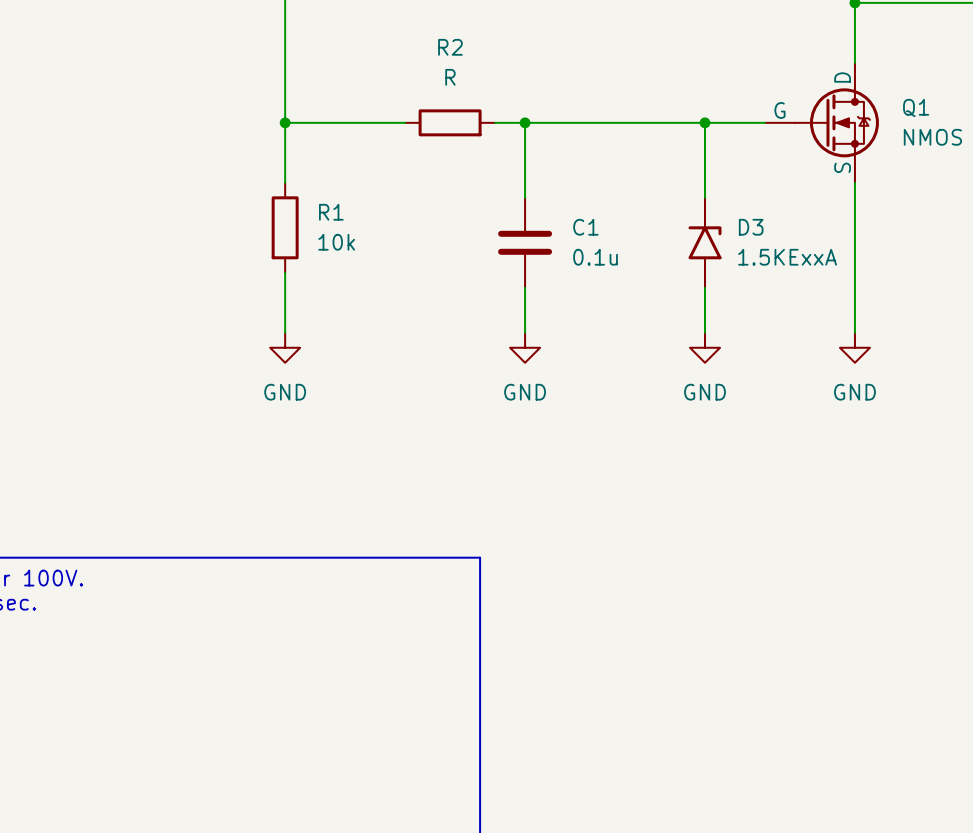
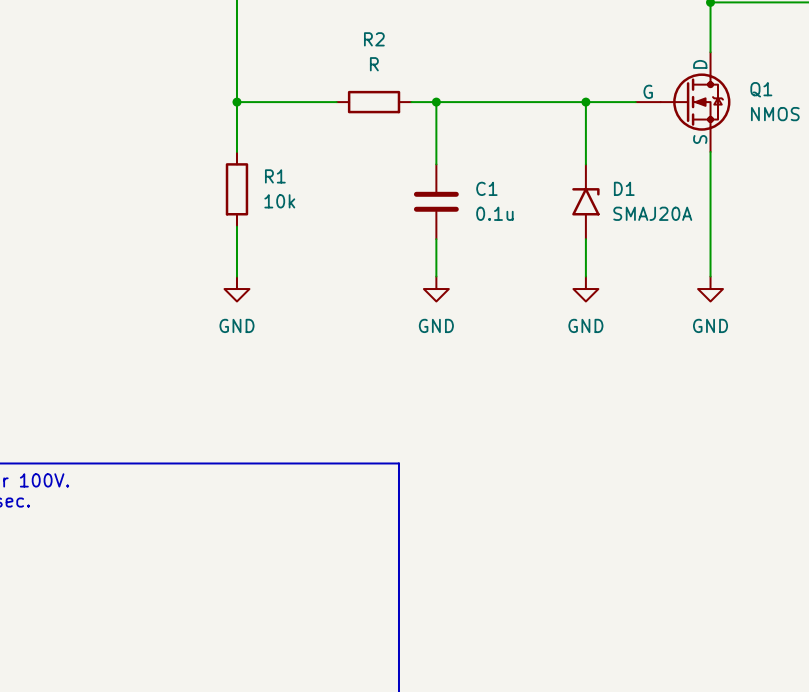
D3 name: D3 (751, 227) -> D1 (624, 188)
D3 value: 1.5KExxA (787, 257) -> SMAJ20A (652, 213)

